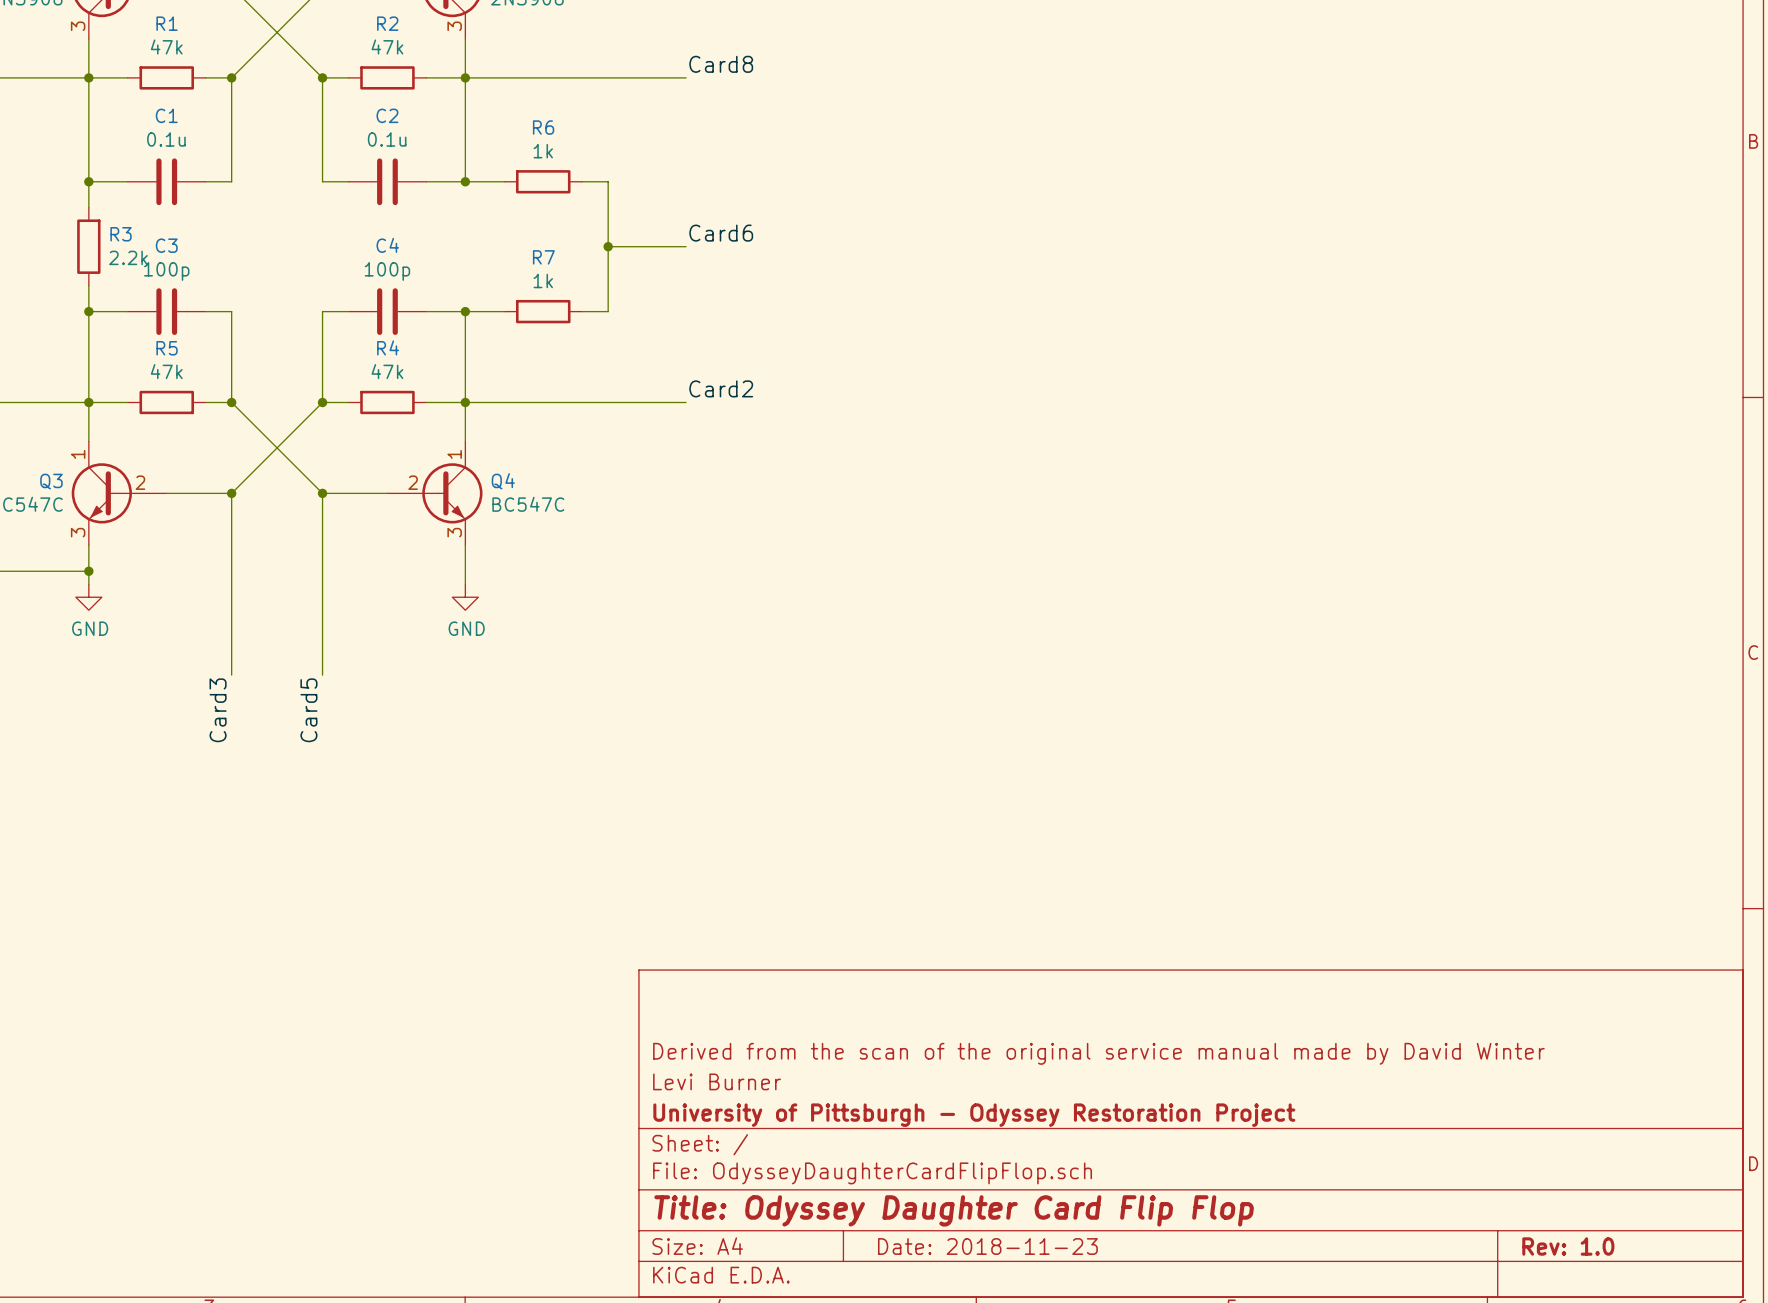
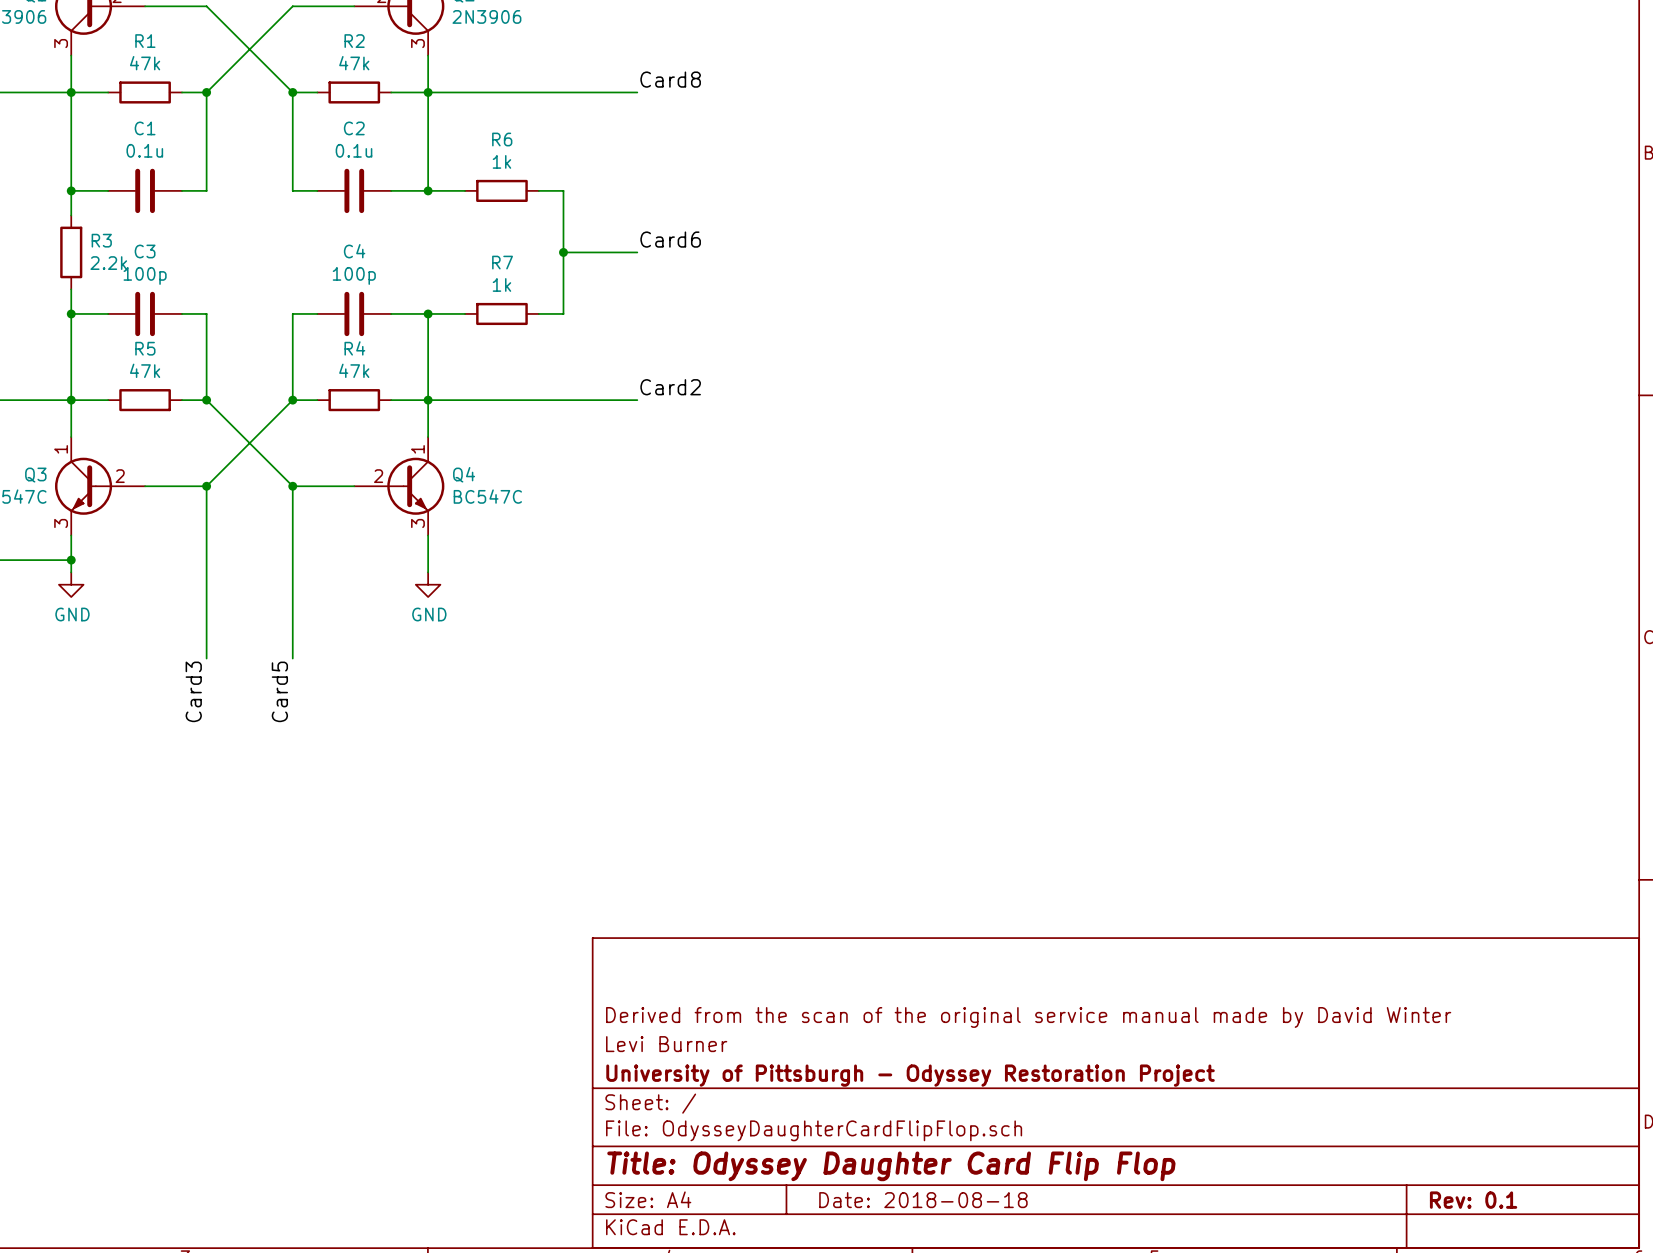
title block: Date: 2018-11-23 (987, 1246) -> Date: 2018-08-18 (923, 1200)
title block: Rev: 1.0 (1568, 1246) -> Rev: 0.1 (1473, 1200)

